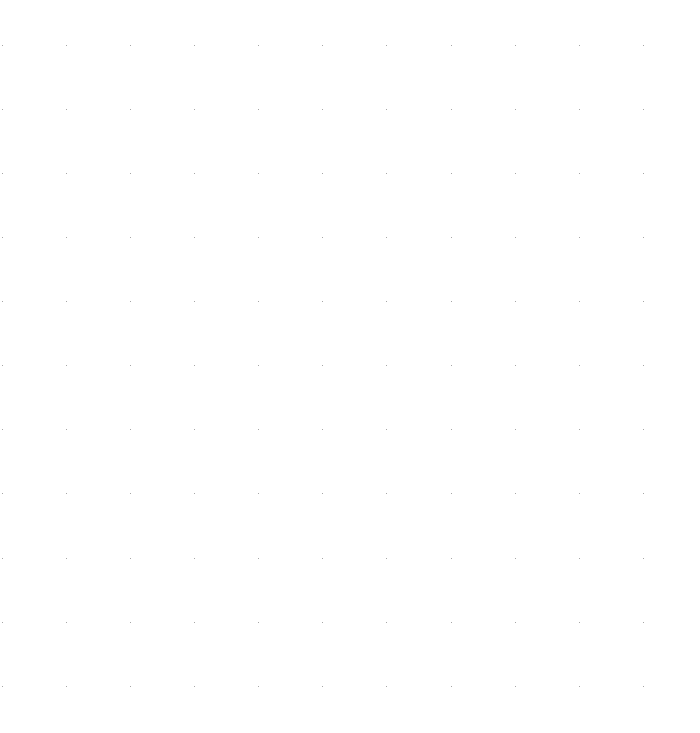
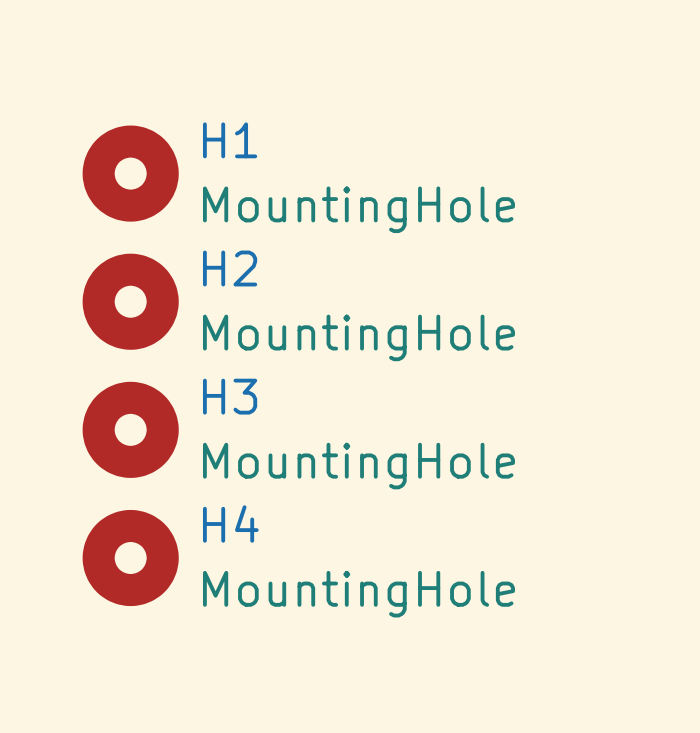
H1: none -> MountingHole (130, 173)
H2: none -> MountingHole (130, 301)
H3: none -> MountingHole (130, 429)
H4: none -> MountingHole (130, 558)

